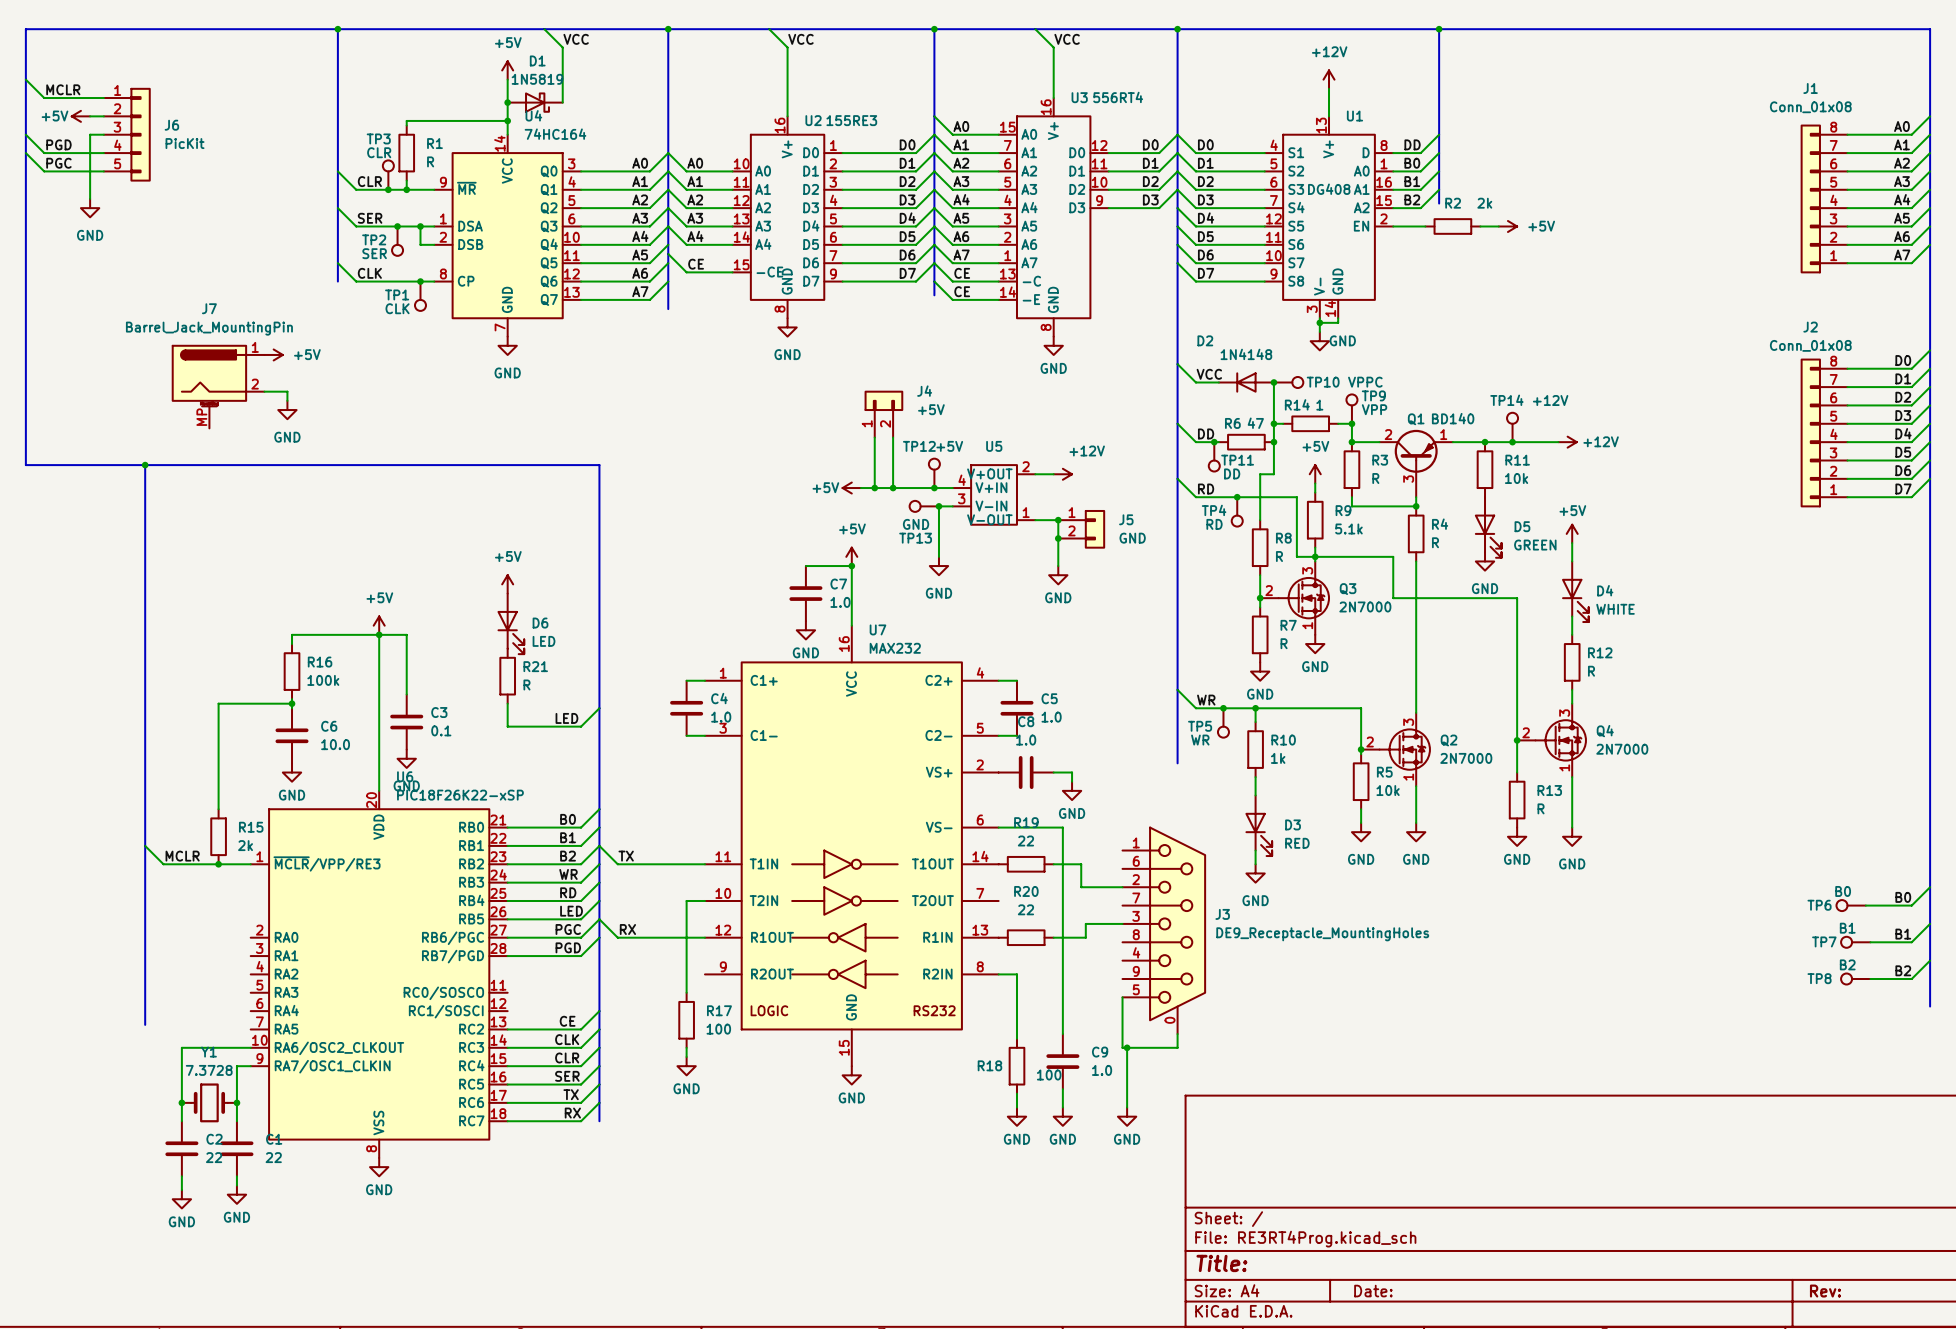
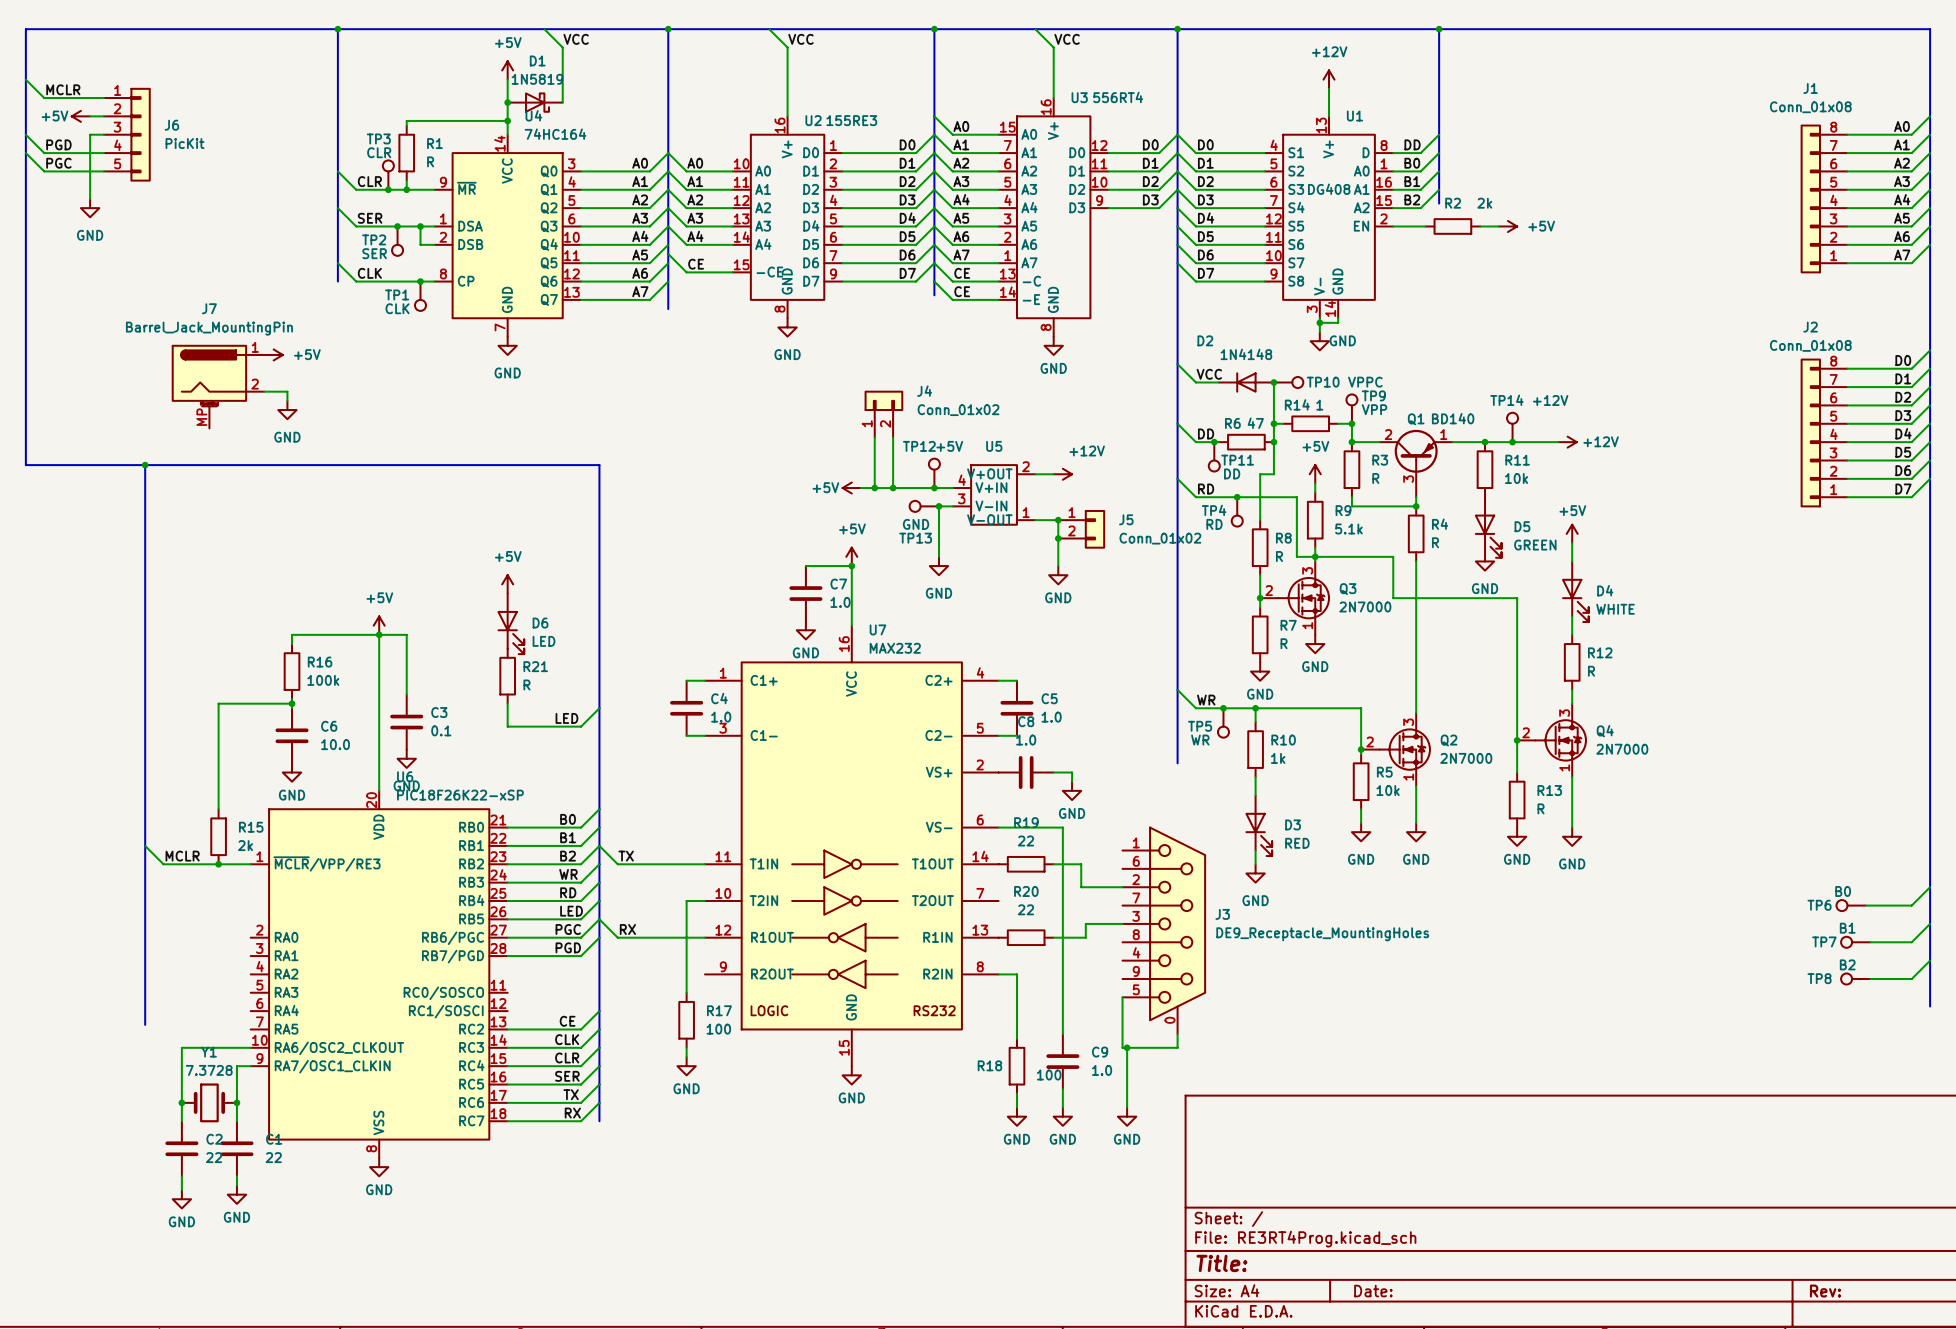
J4 value: +5V (931, 409) -> Conn_01x02 (958, 410)
J5 value: GND (1132, 538) -> Conn_01x02 (1160, 538)
label: B0 (1903, 897) -> none
label: B1 (1903, 934) -> none
label: B2 (1903, 970) -> none

